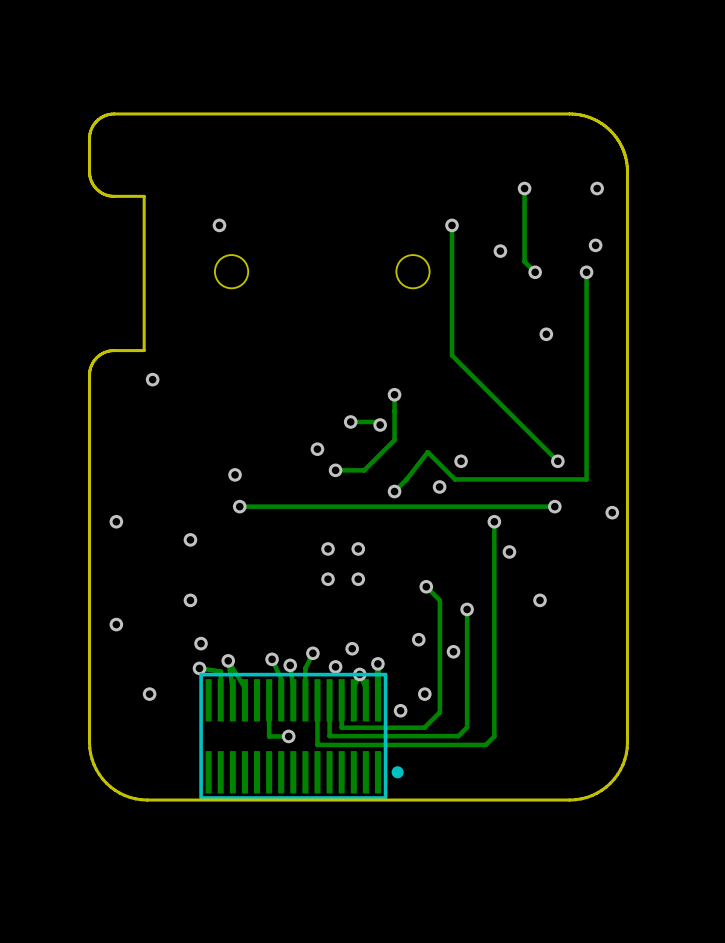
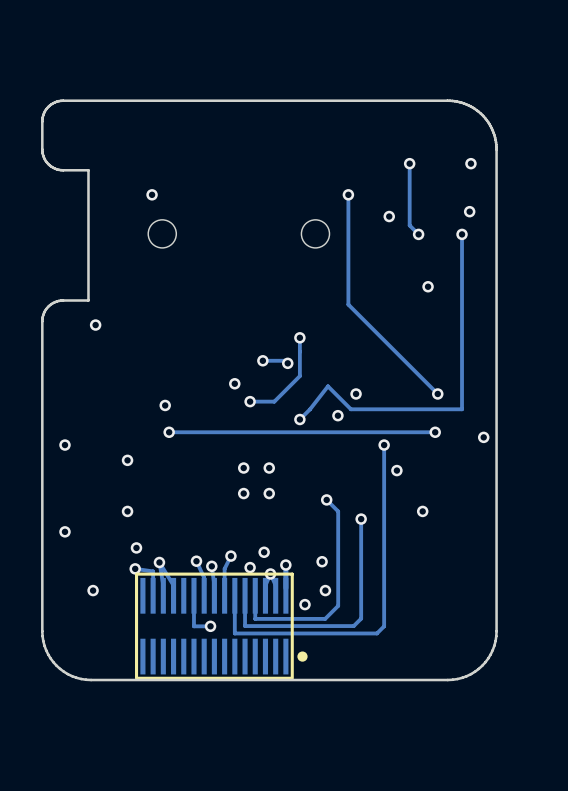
via: (418, 639) -> none
via: (453, 651) -> none
via: none -> (322, 561)

